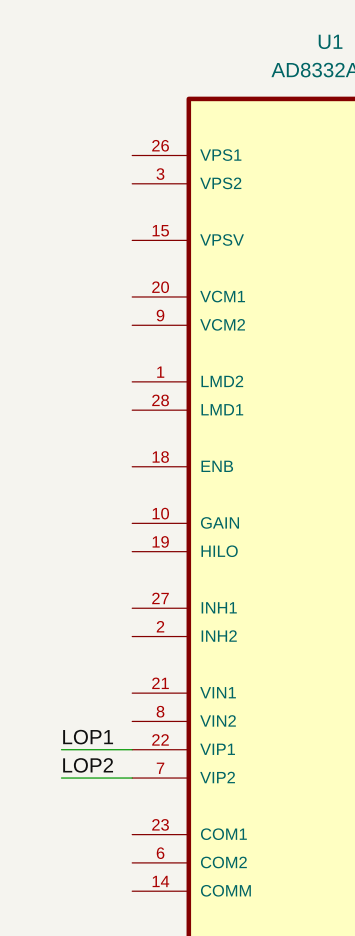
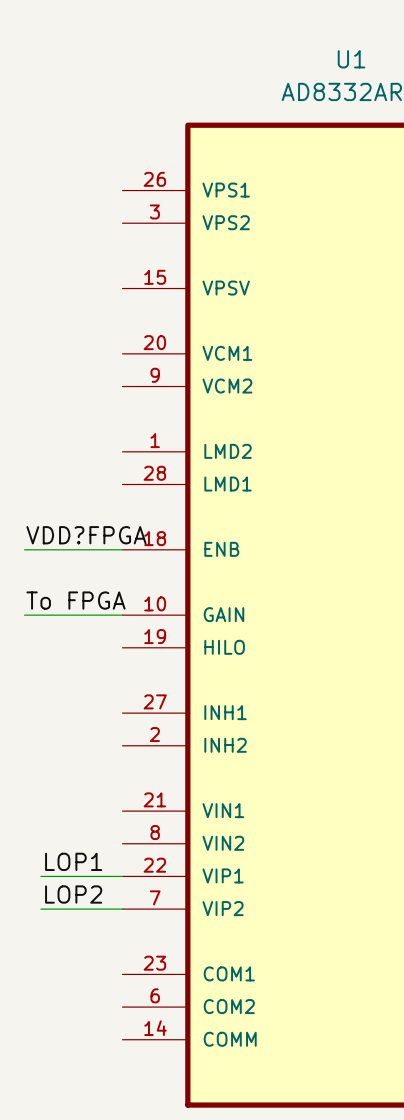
label: none -> VDD?FPGA (86, 535)
wire: none -> (24, 549) (122, 549)
label: none -> To FPGA (75, 600)
wire: none -> (24, 615) (122, 615)

